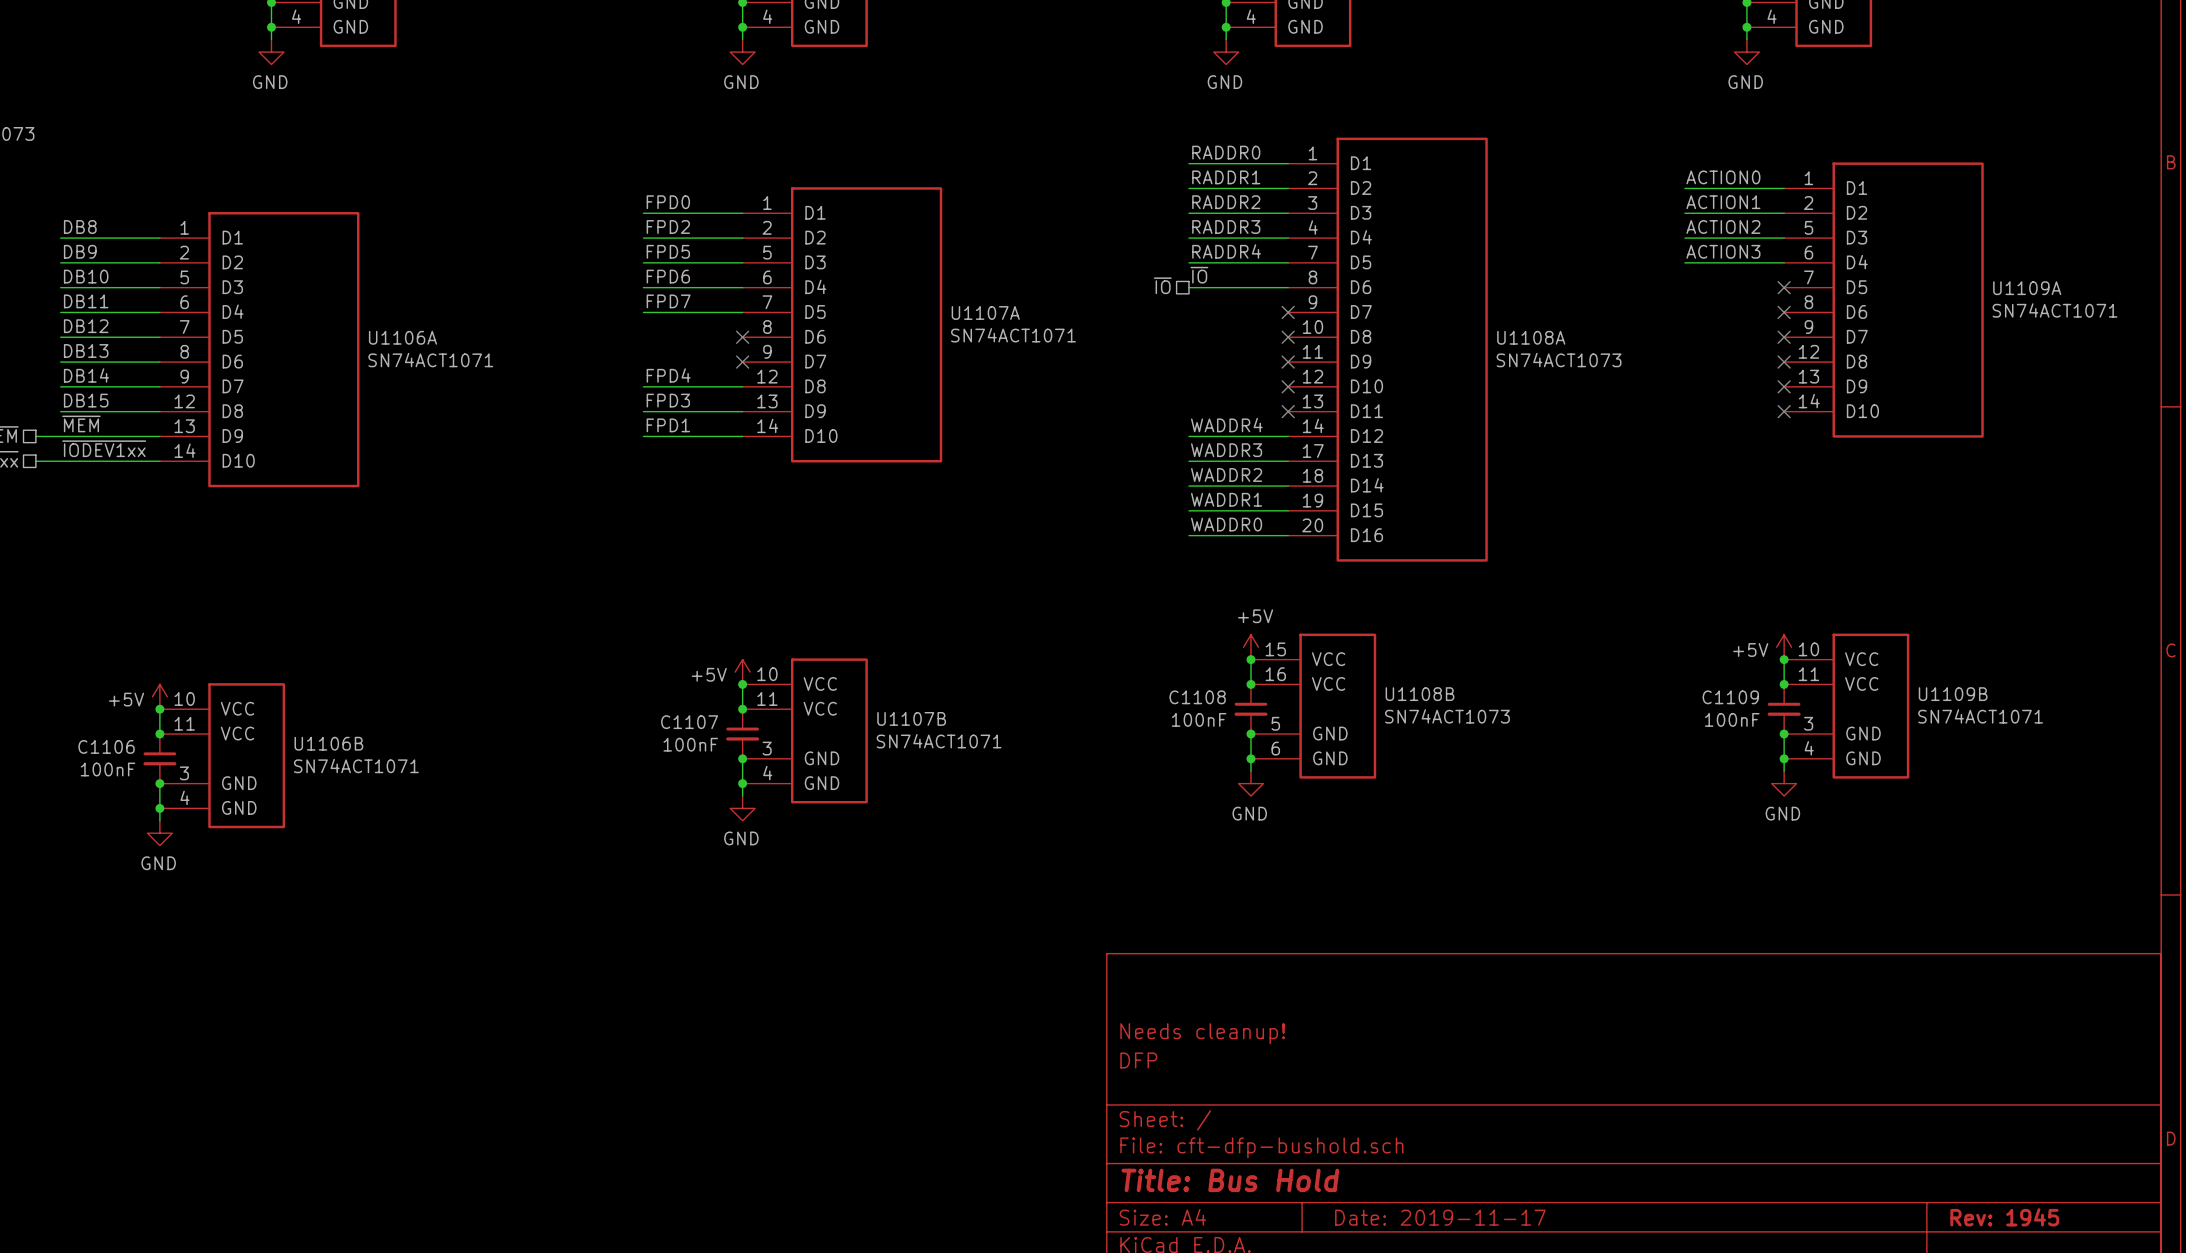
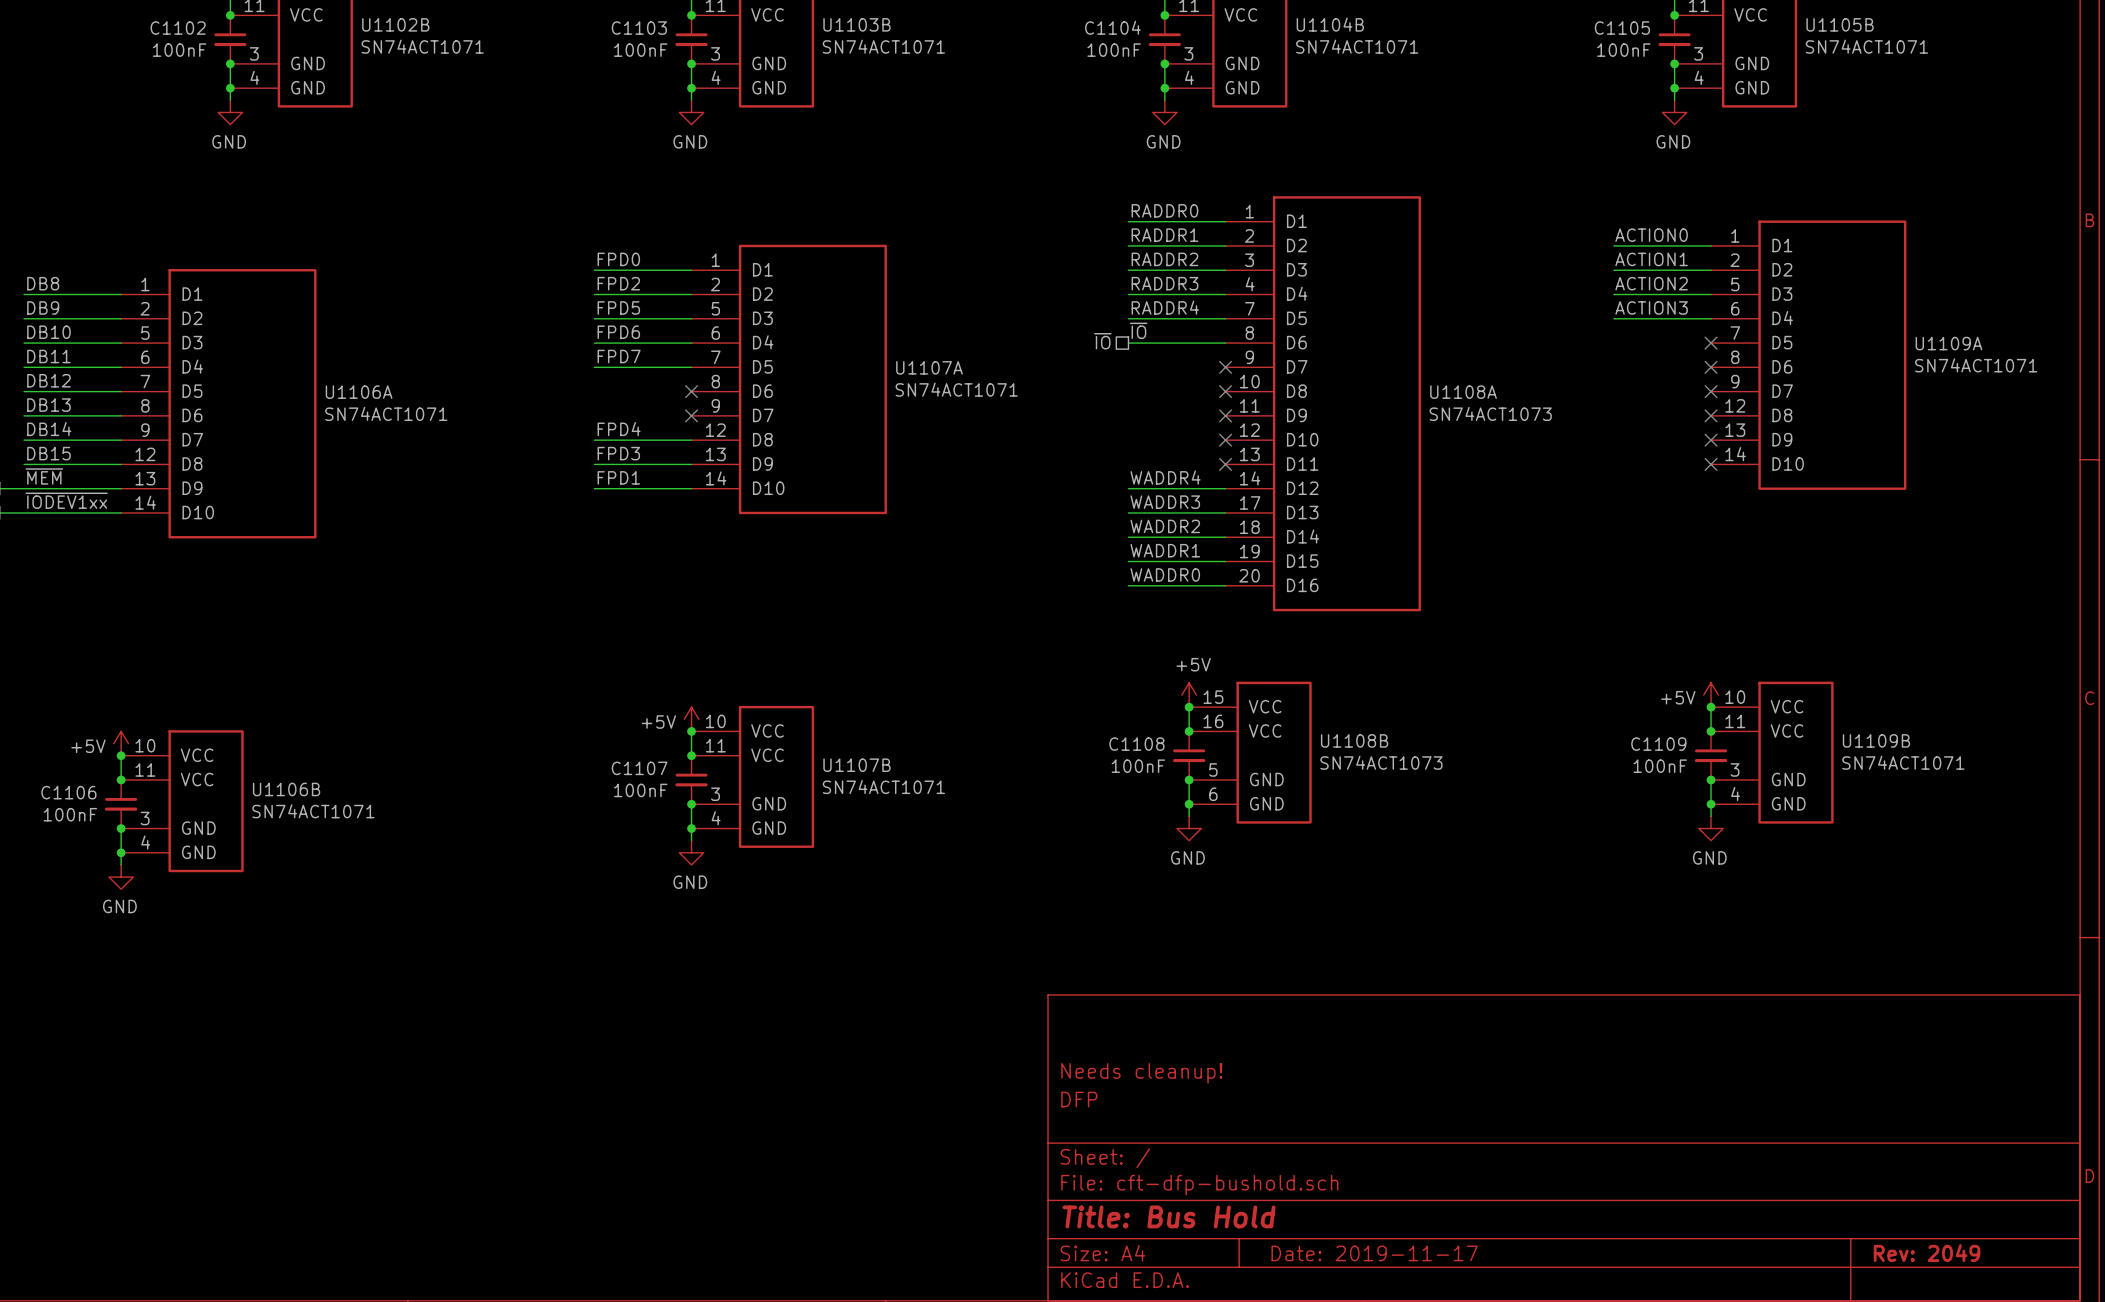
title block: Rev: 1945 (2004, 1217) -> Rev: 2049 (1927, 1253)

